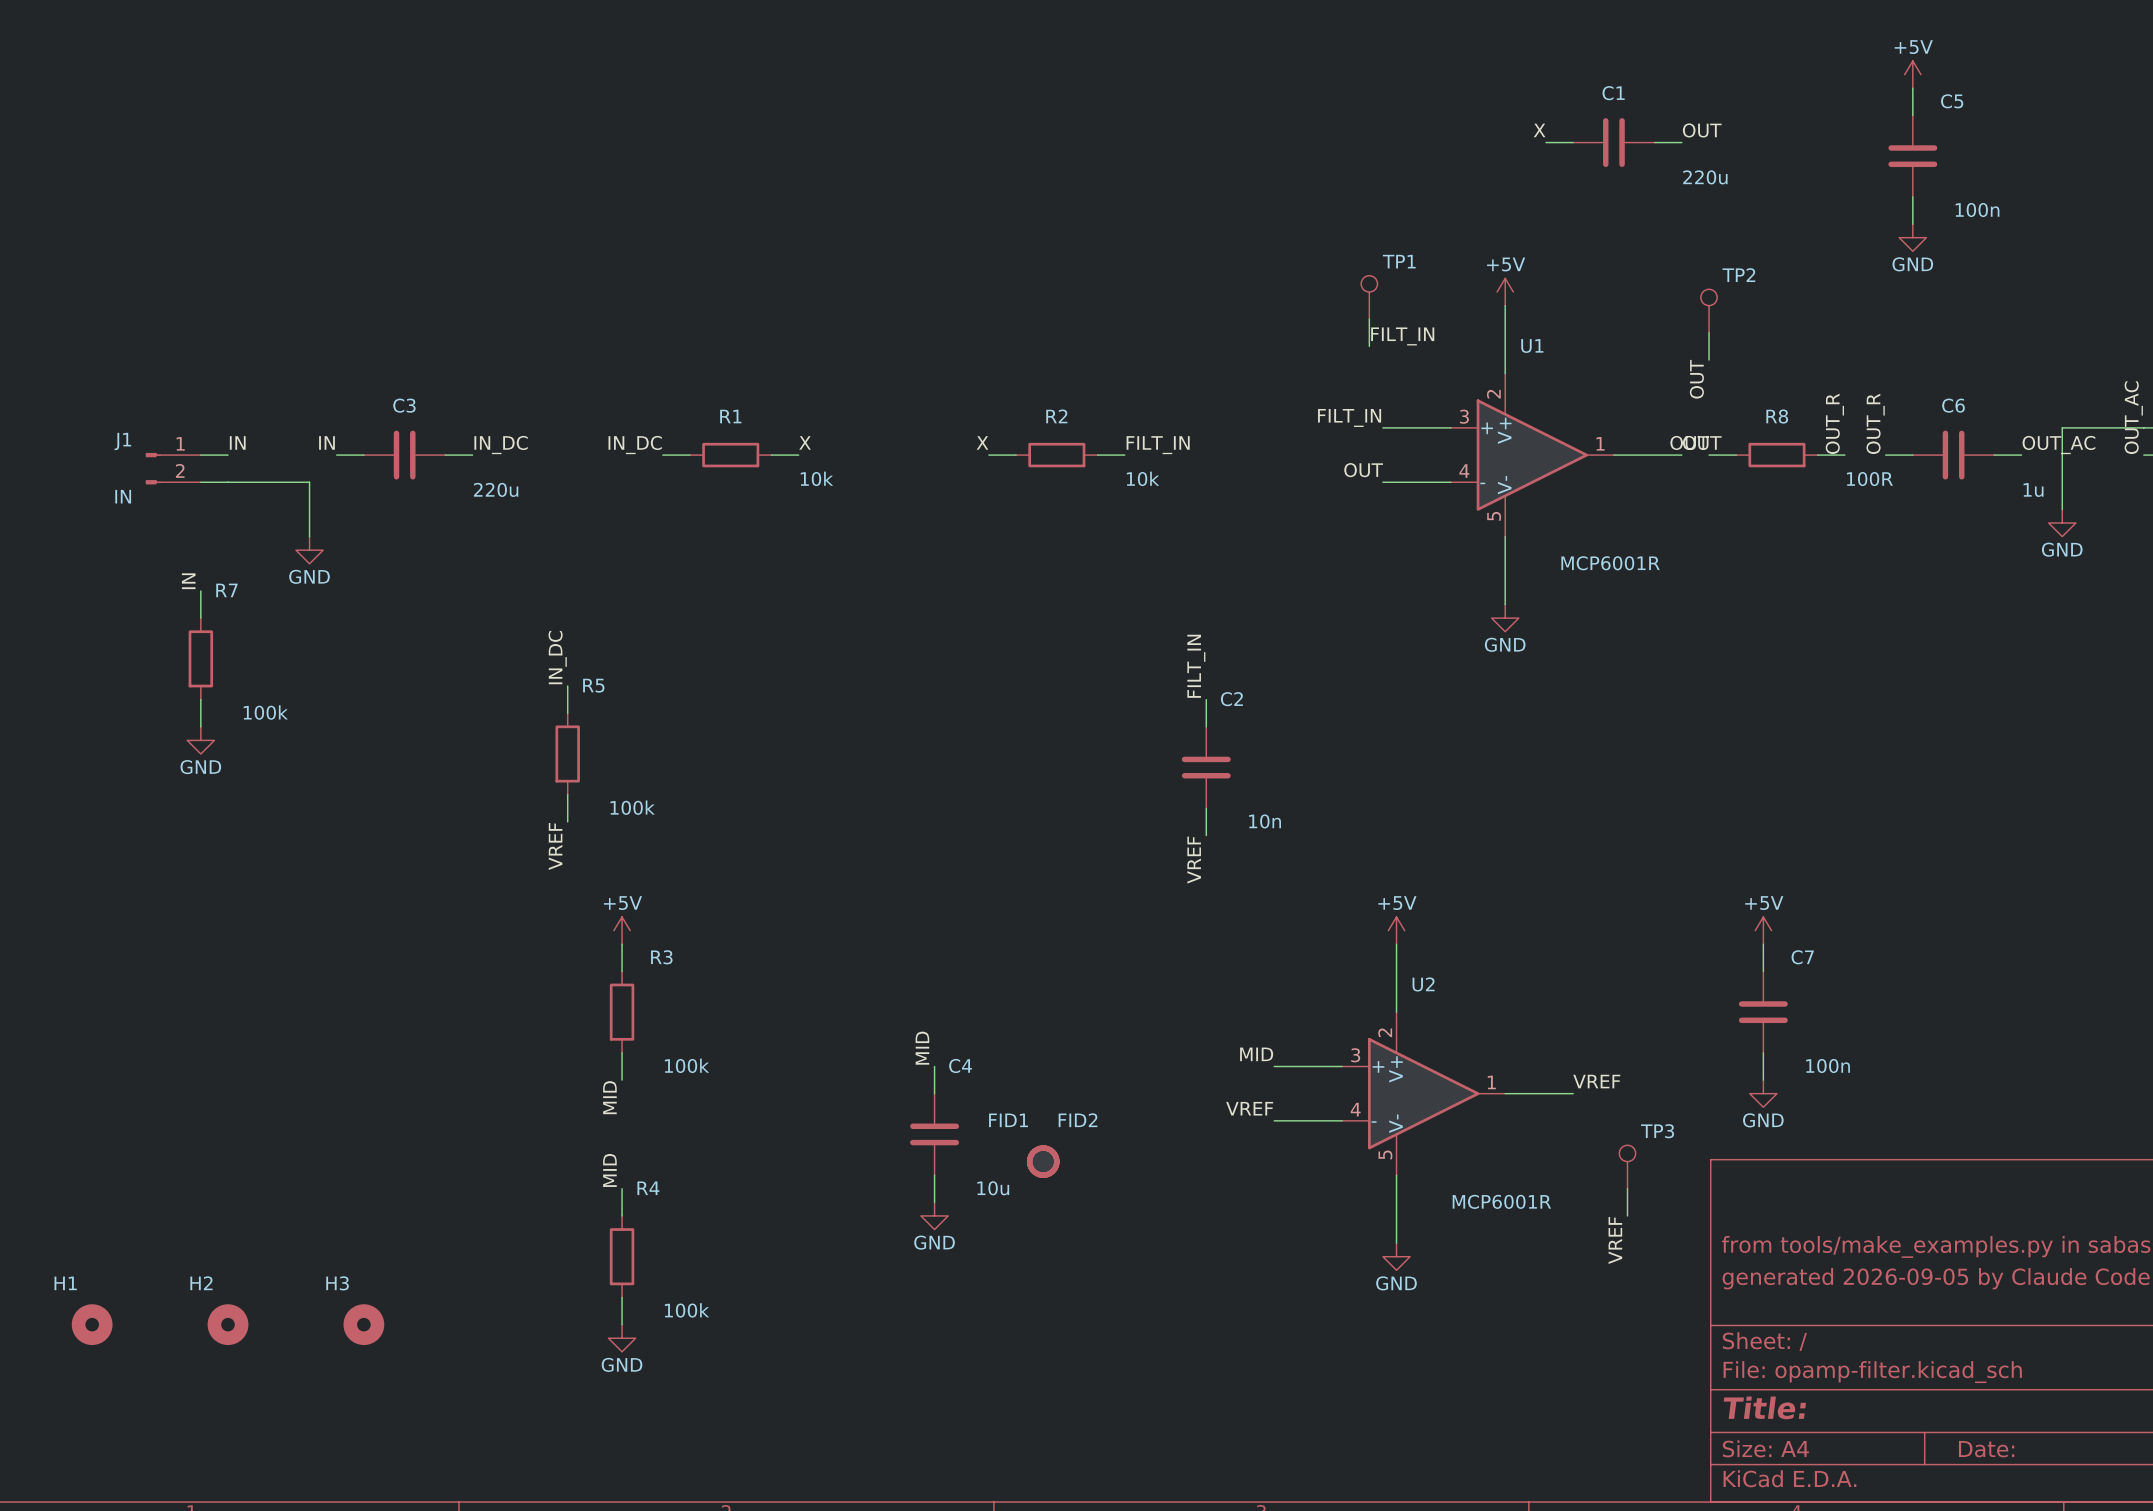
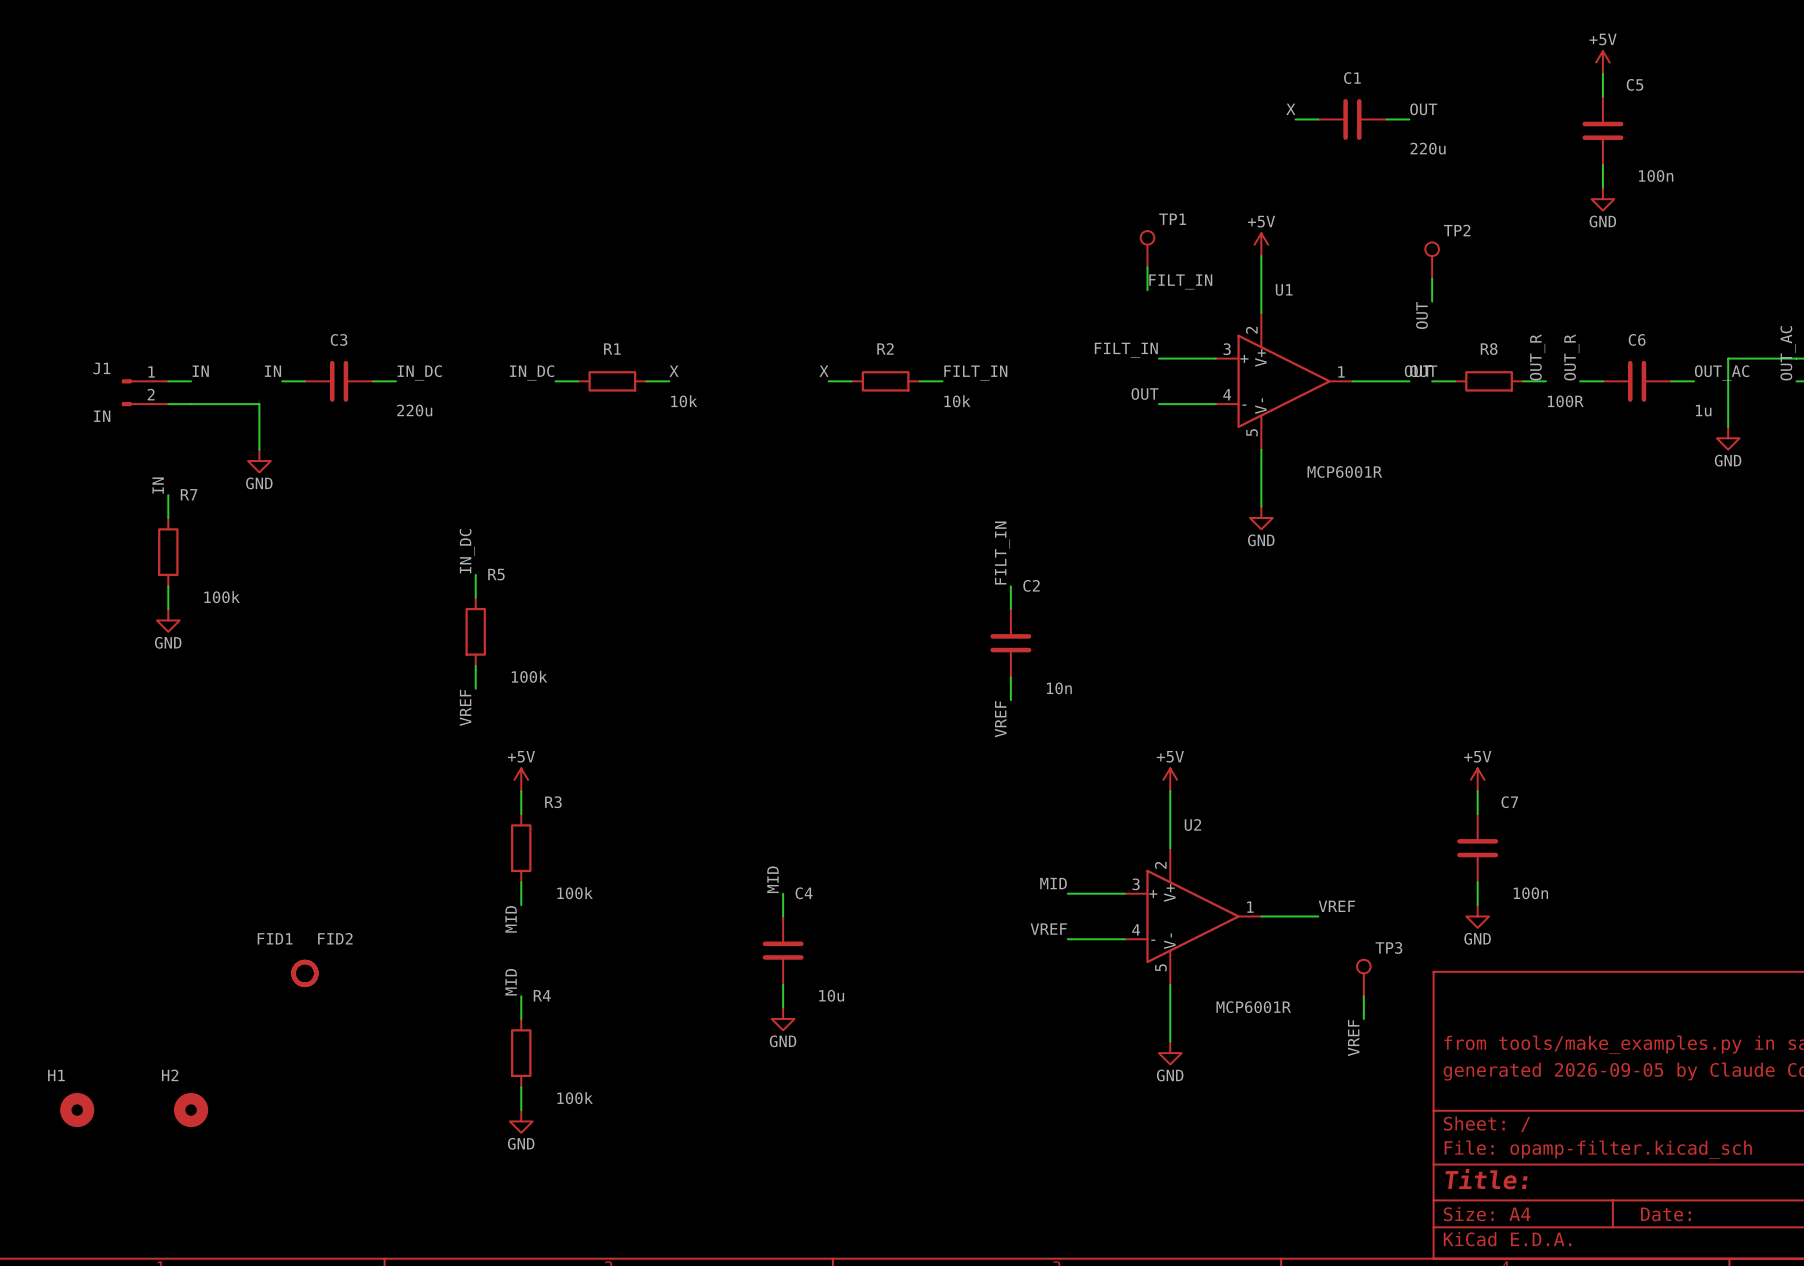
FID1 position: (1043, 1161) -> (304, 973)
FID2 position: (1043, 1161) -> (304, 973)
H3: (363, 1324) -> none

